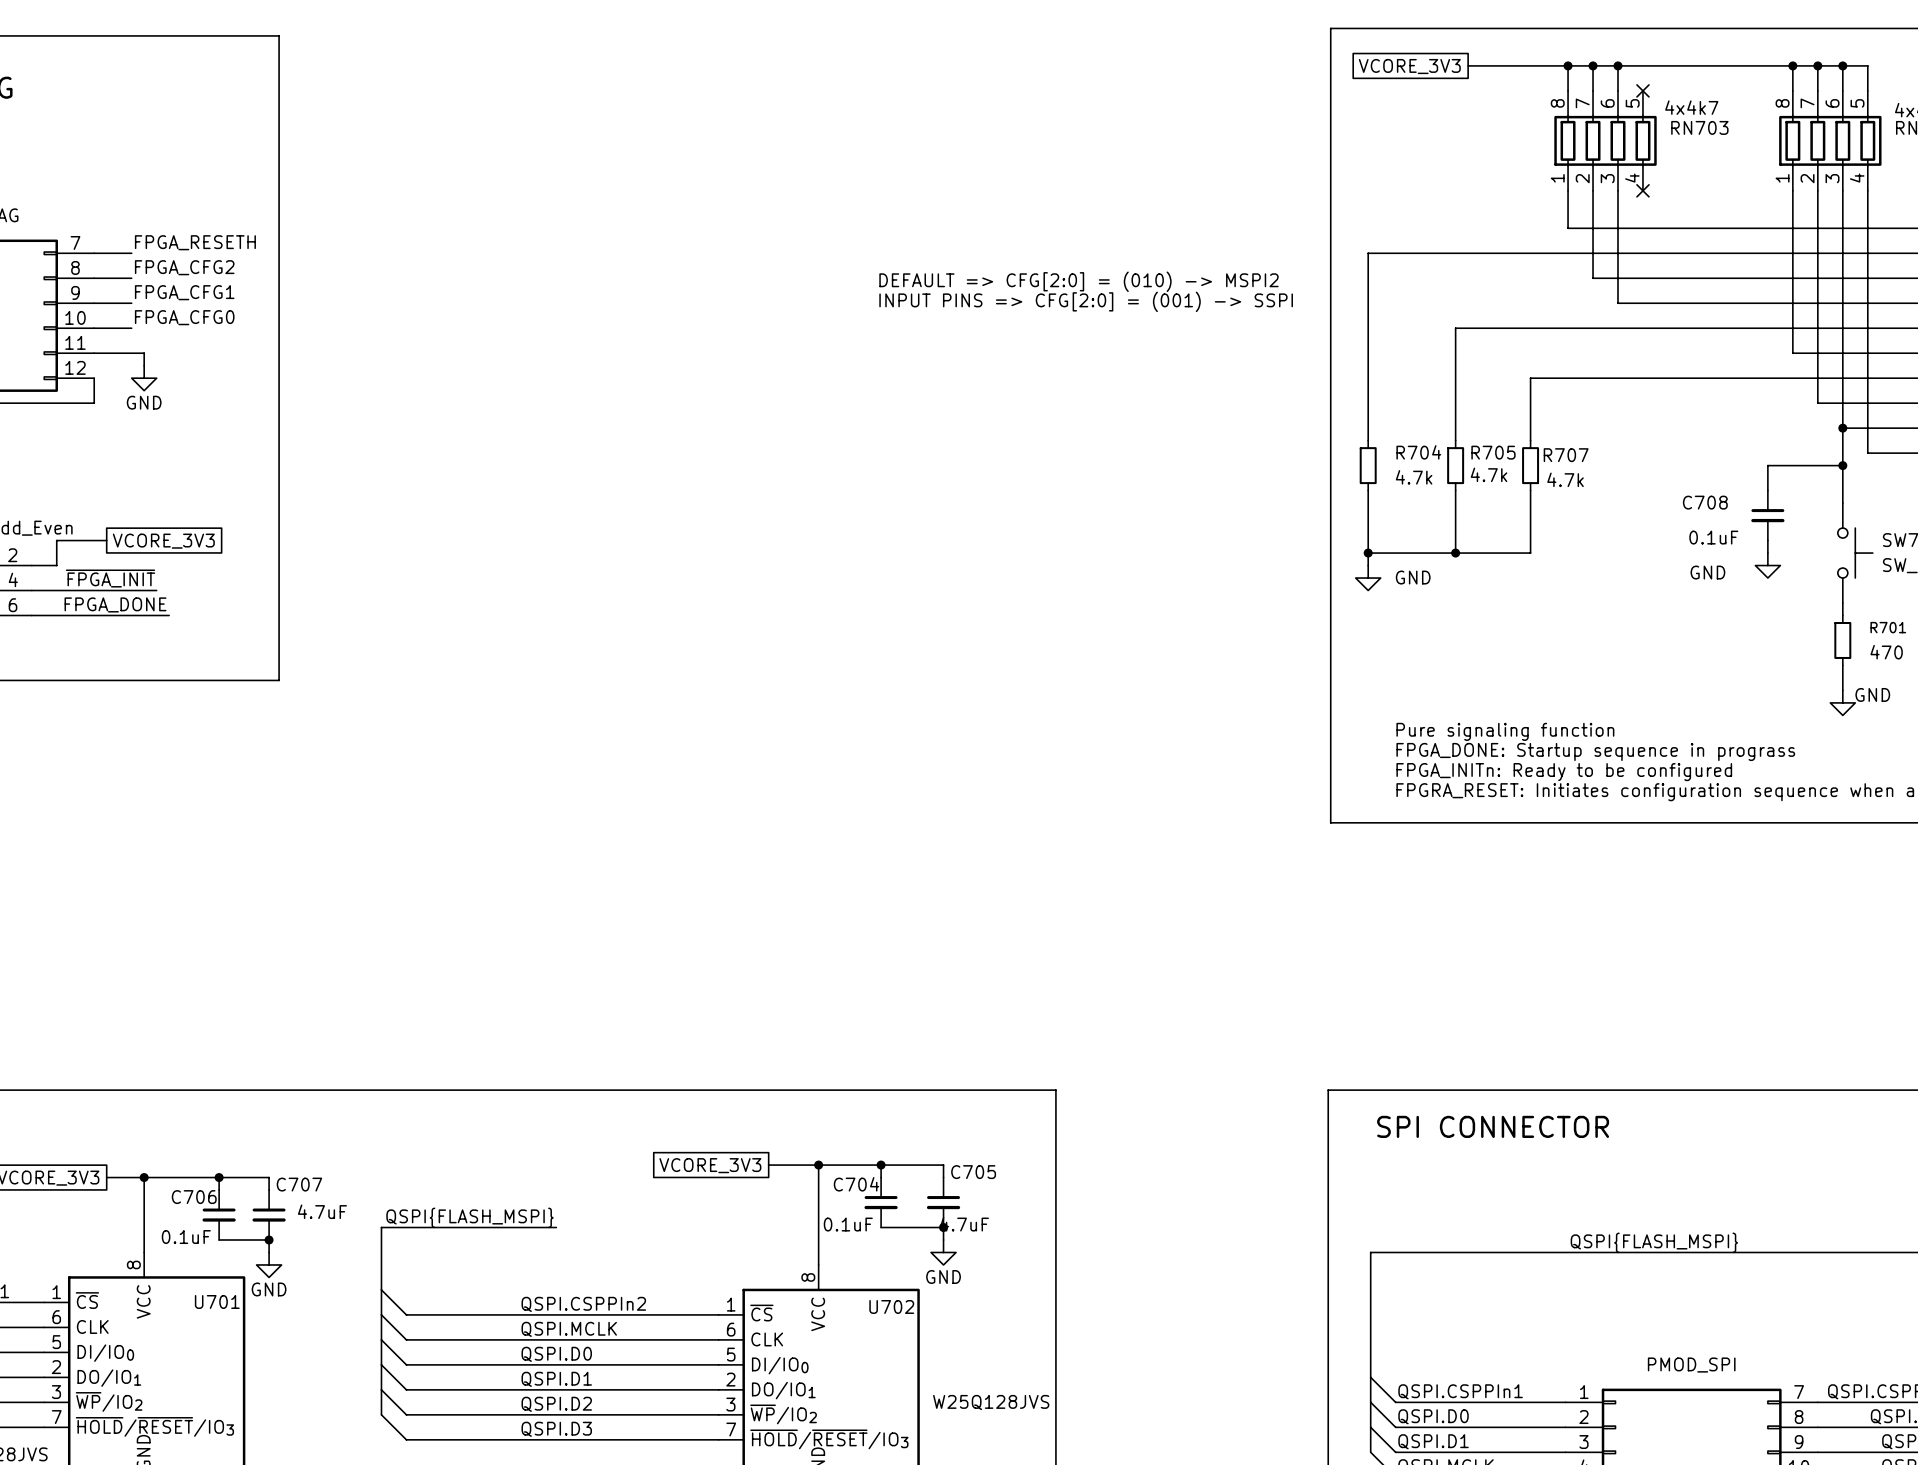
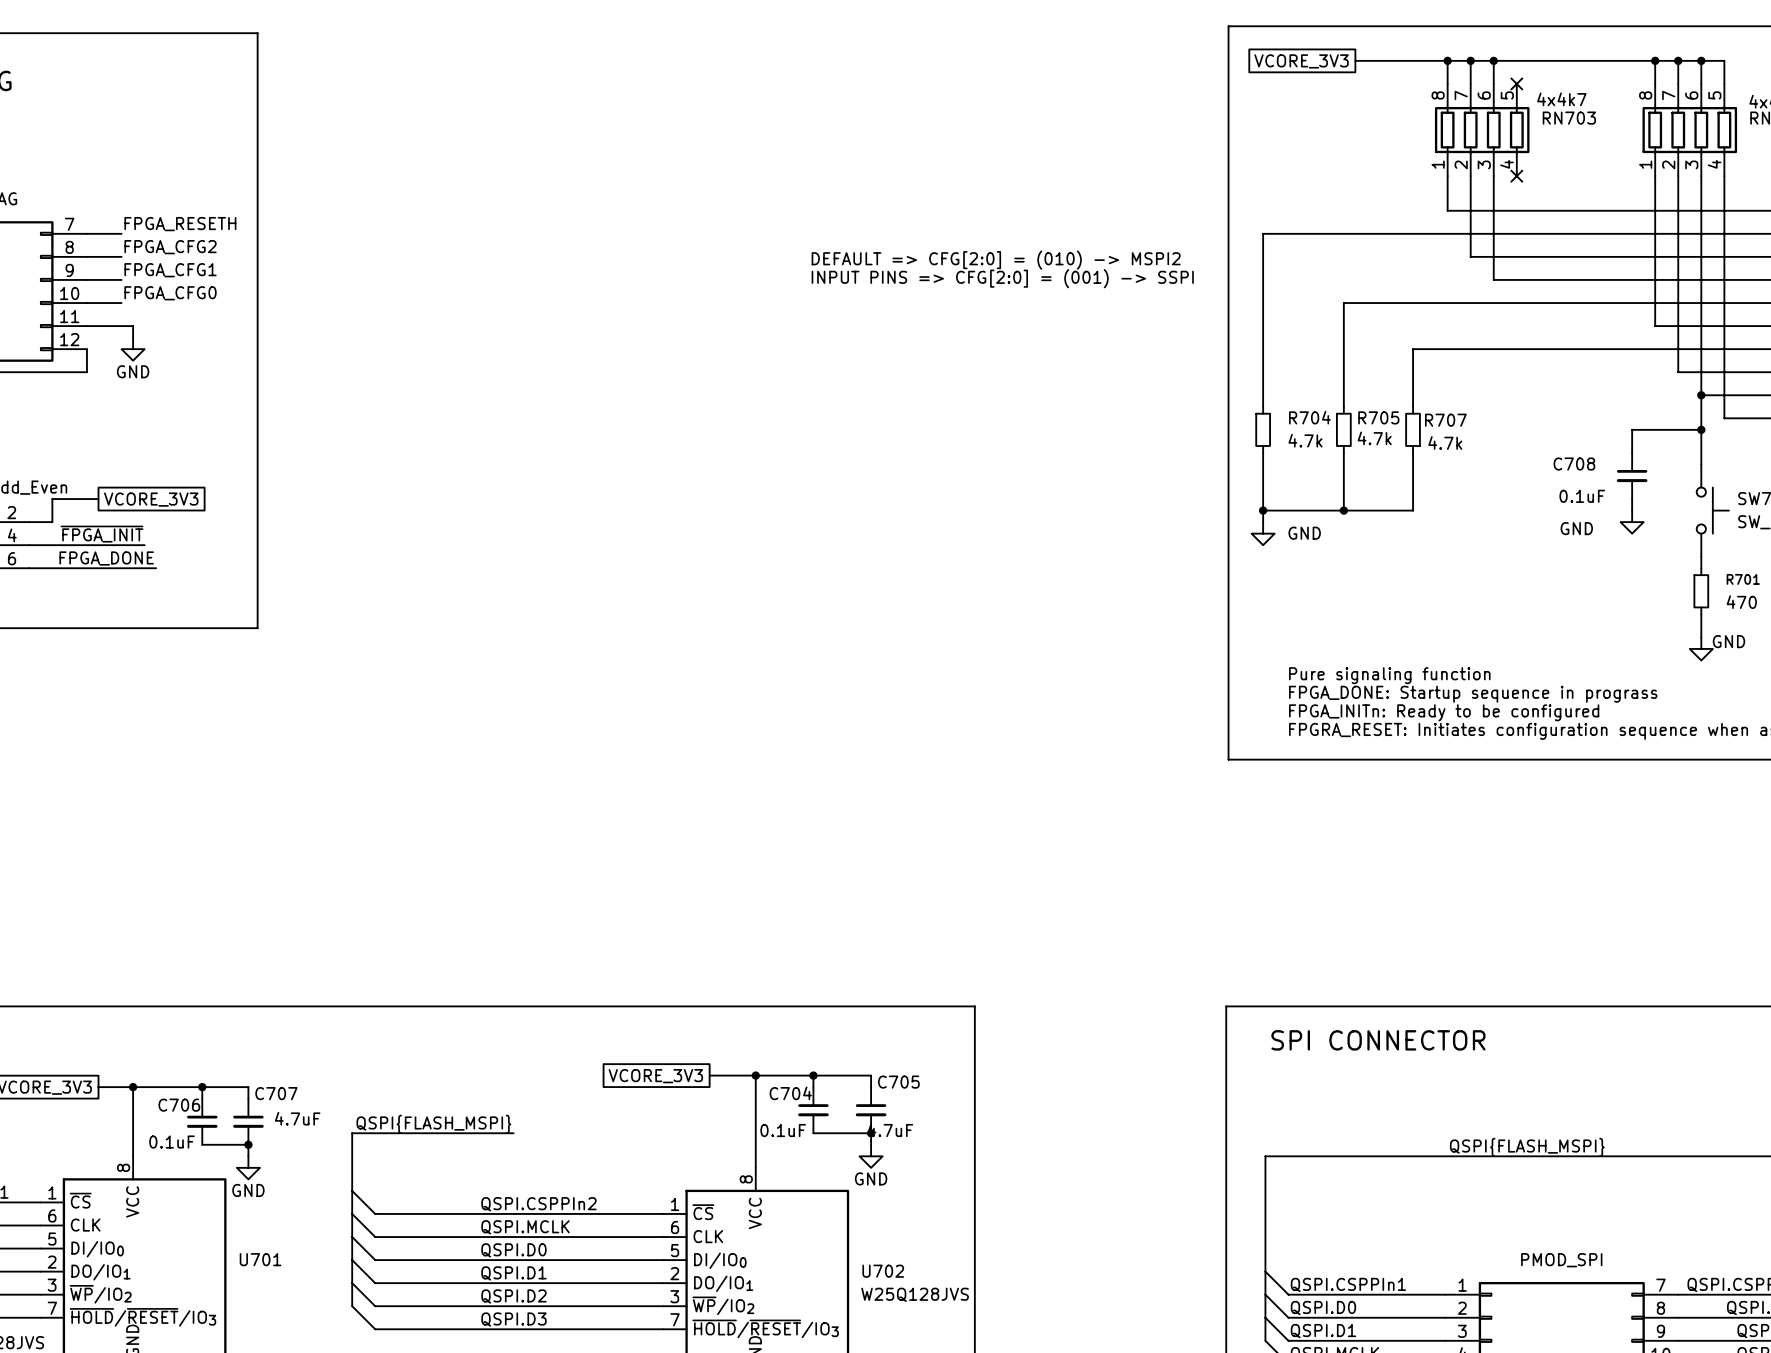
U701 name position: U701 (217, 1301) -> U701 (260, 1259)
U702 name position: U702 (891, 1306) -> U702 (883, 1271)

